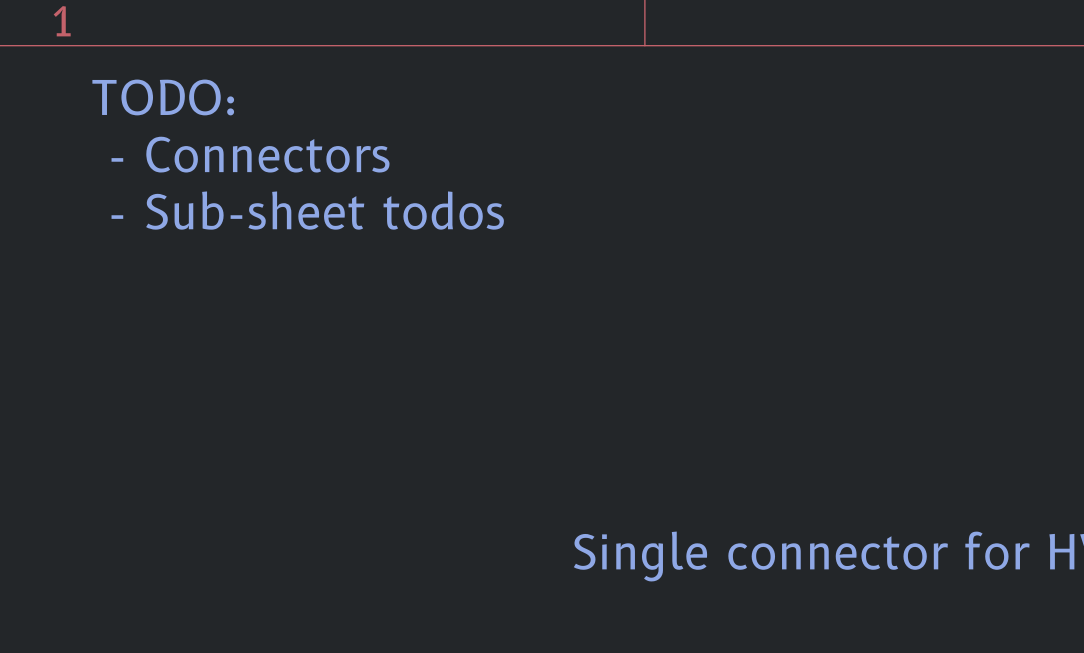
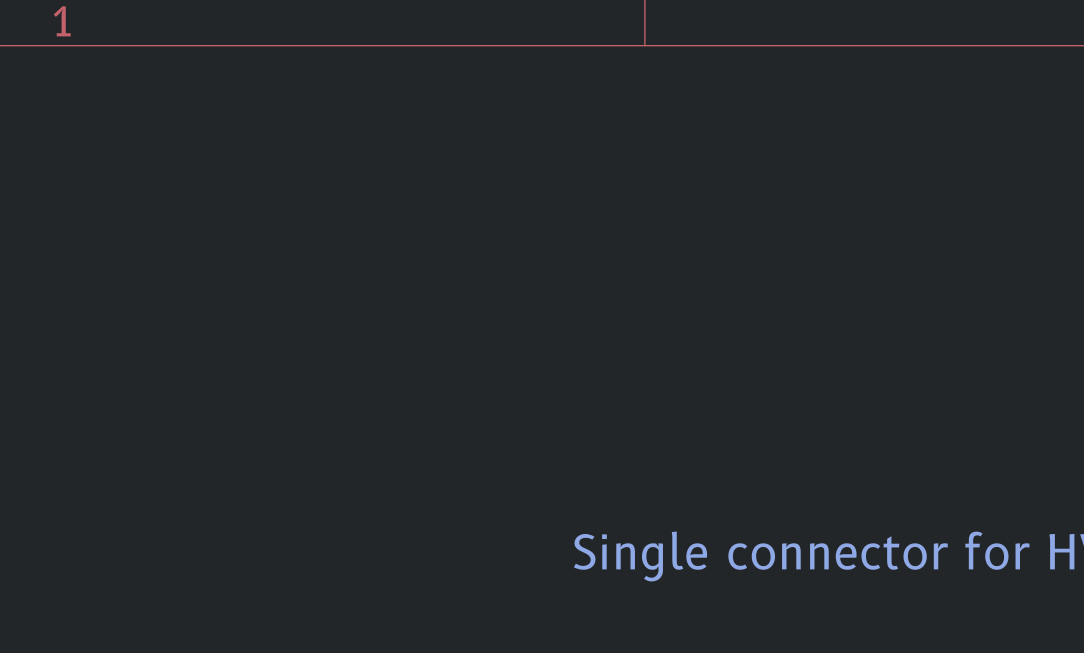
text: TODO: (163, 97) -> none
text: - Connectors (250, 154) -> none
text: - Sub-sheet todos (307, 210) -> none

